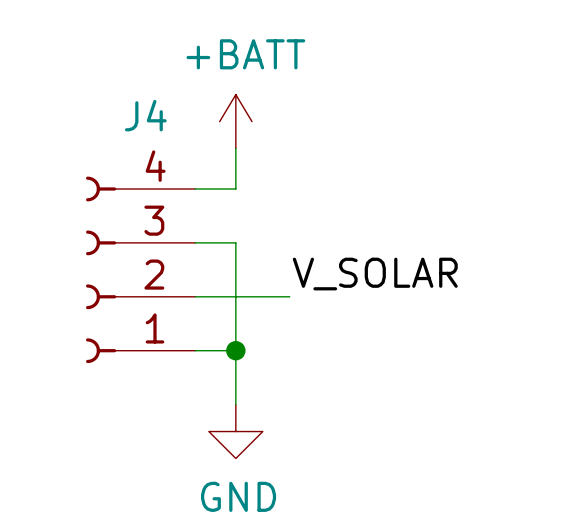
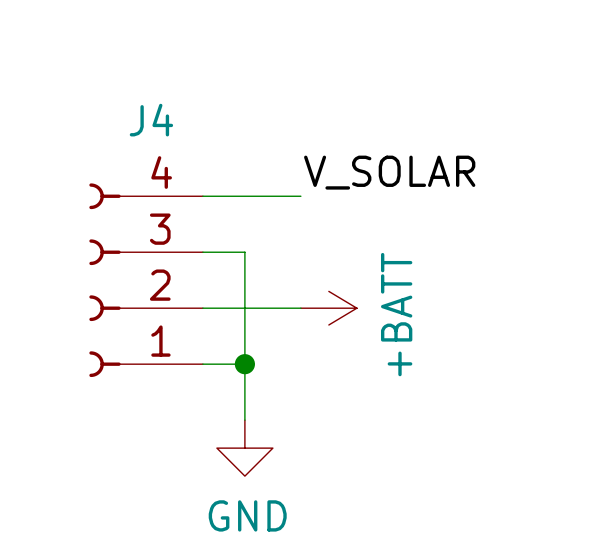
power symbol: +BATT (235, 121) -> none
wire: (235, 148) (235, 188) -> (300, 196) (244, 196)
label position: V_SOLAR (375, 274) -> V_SOLAR (389, 172)
power symbol: none -> +BATT (328, 308)

